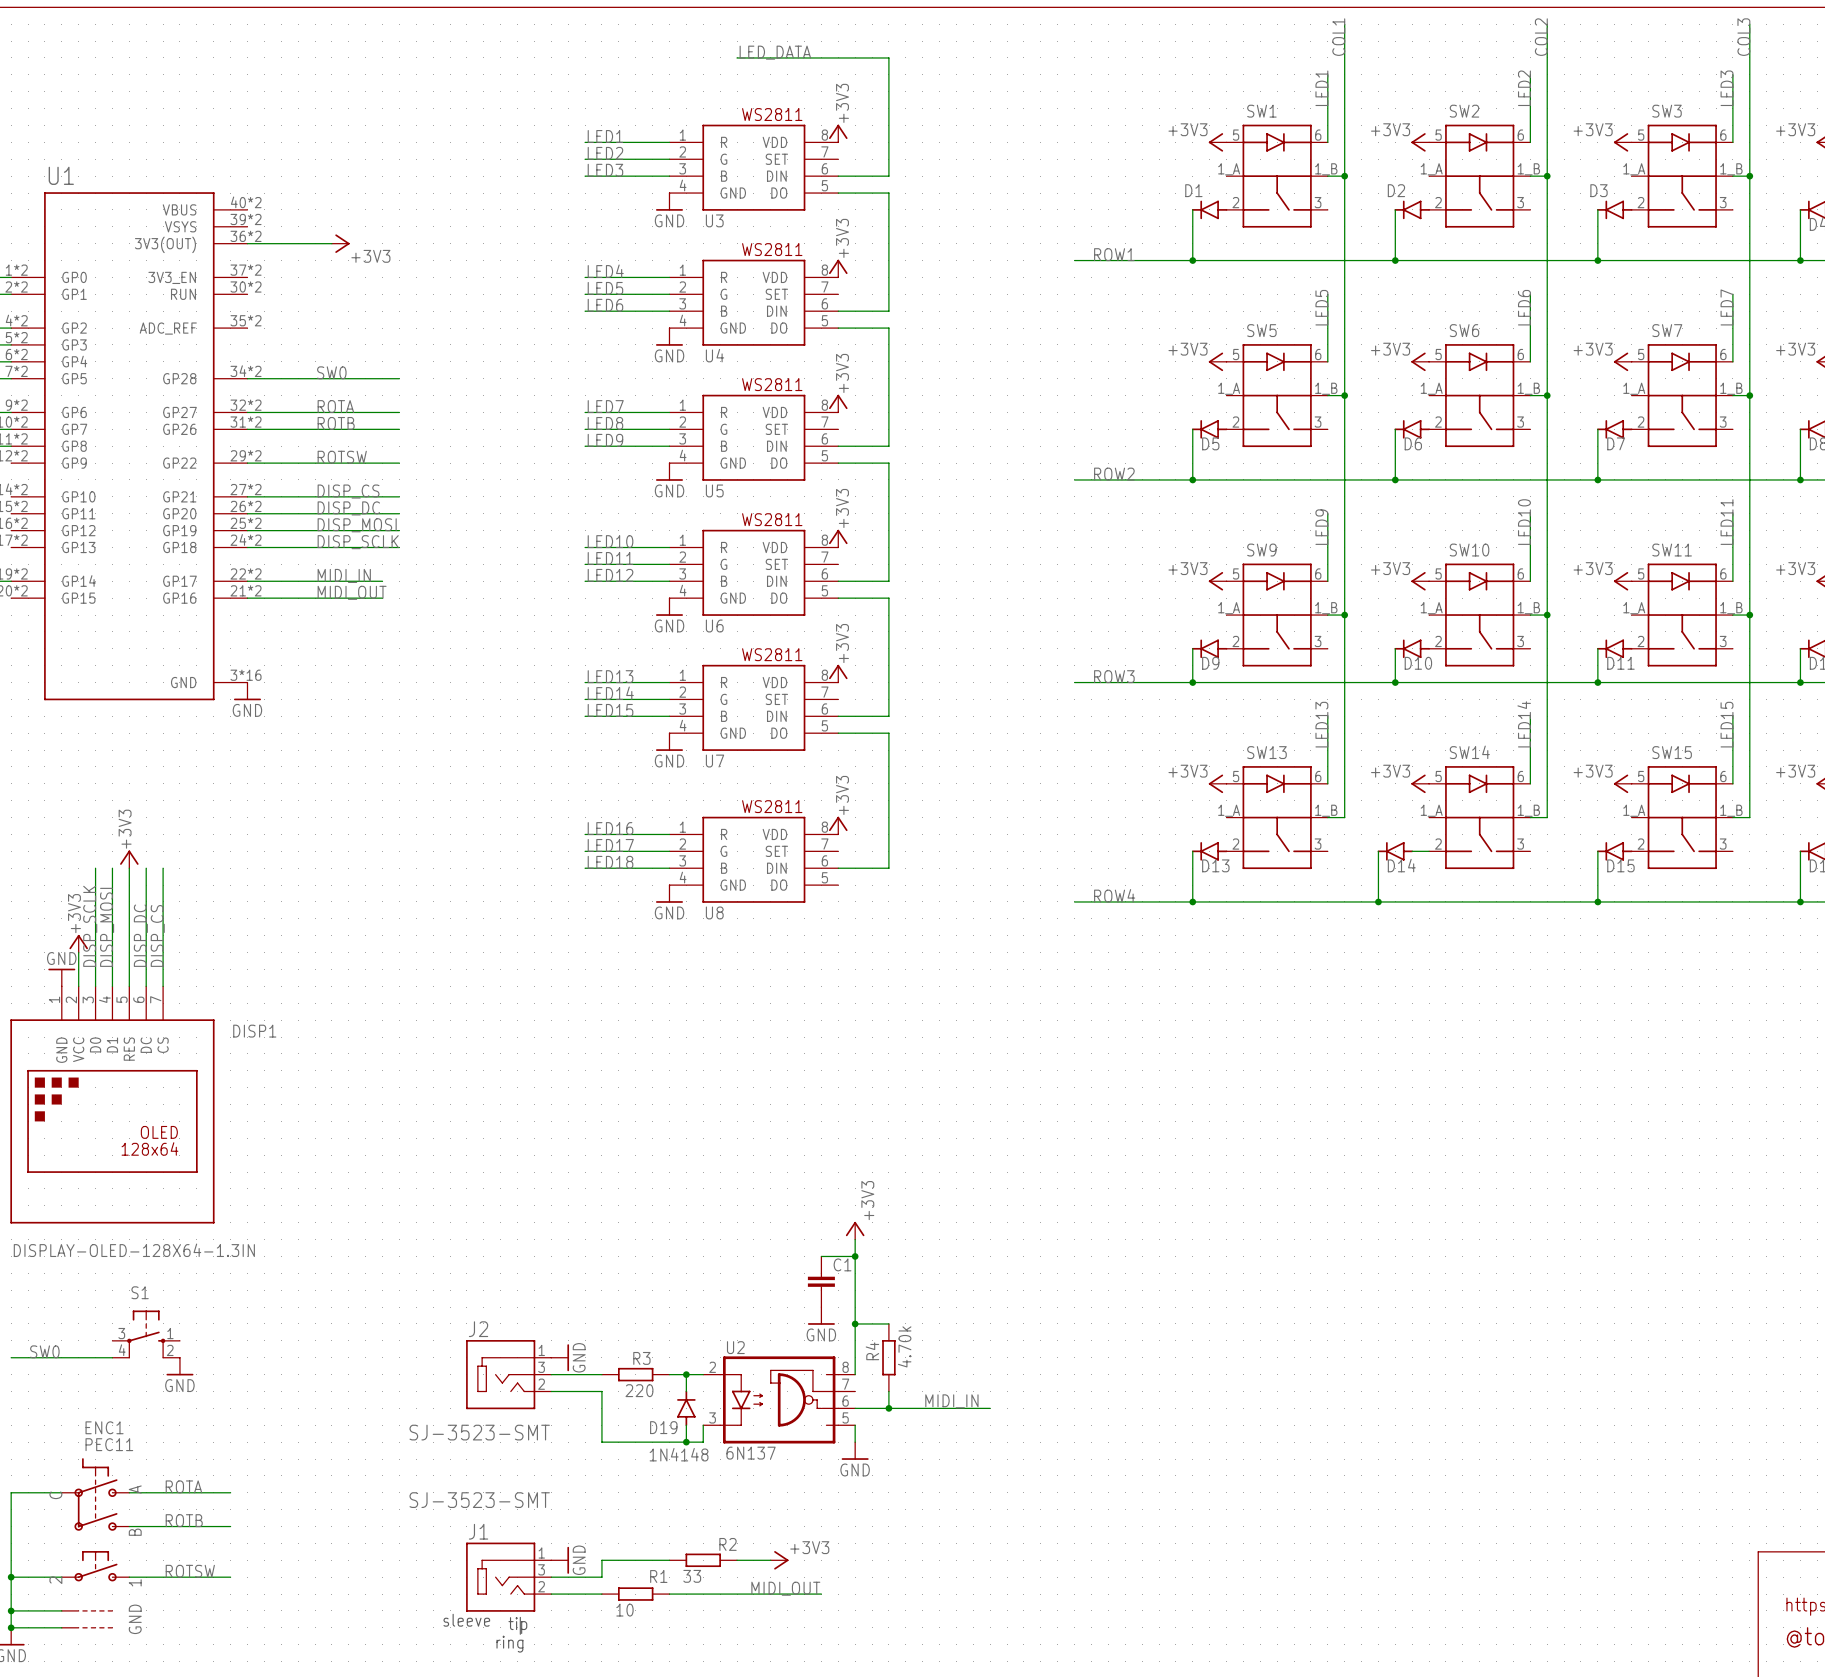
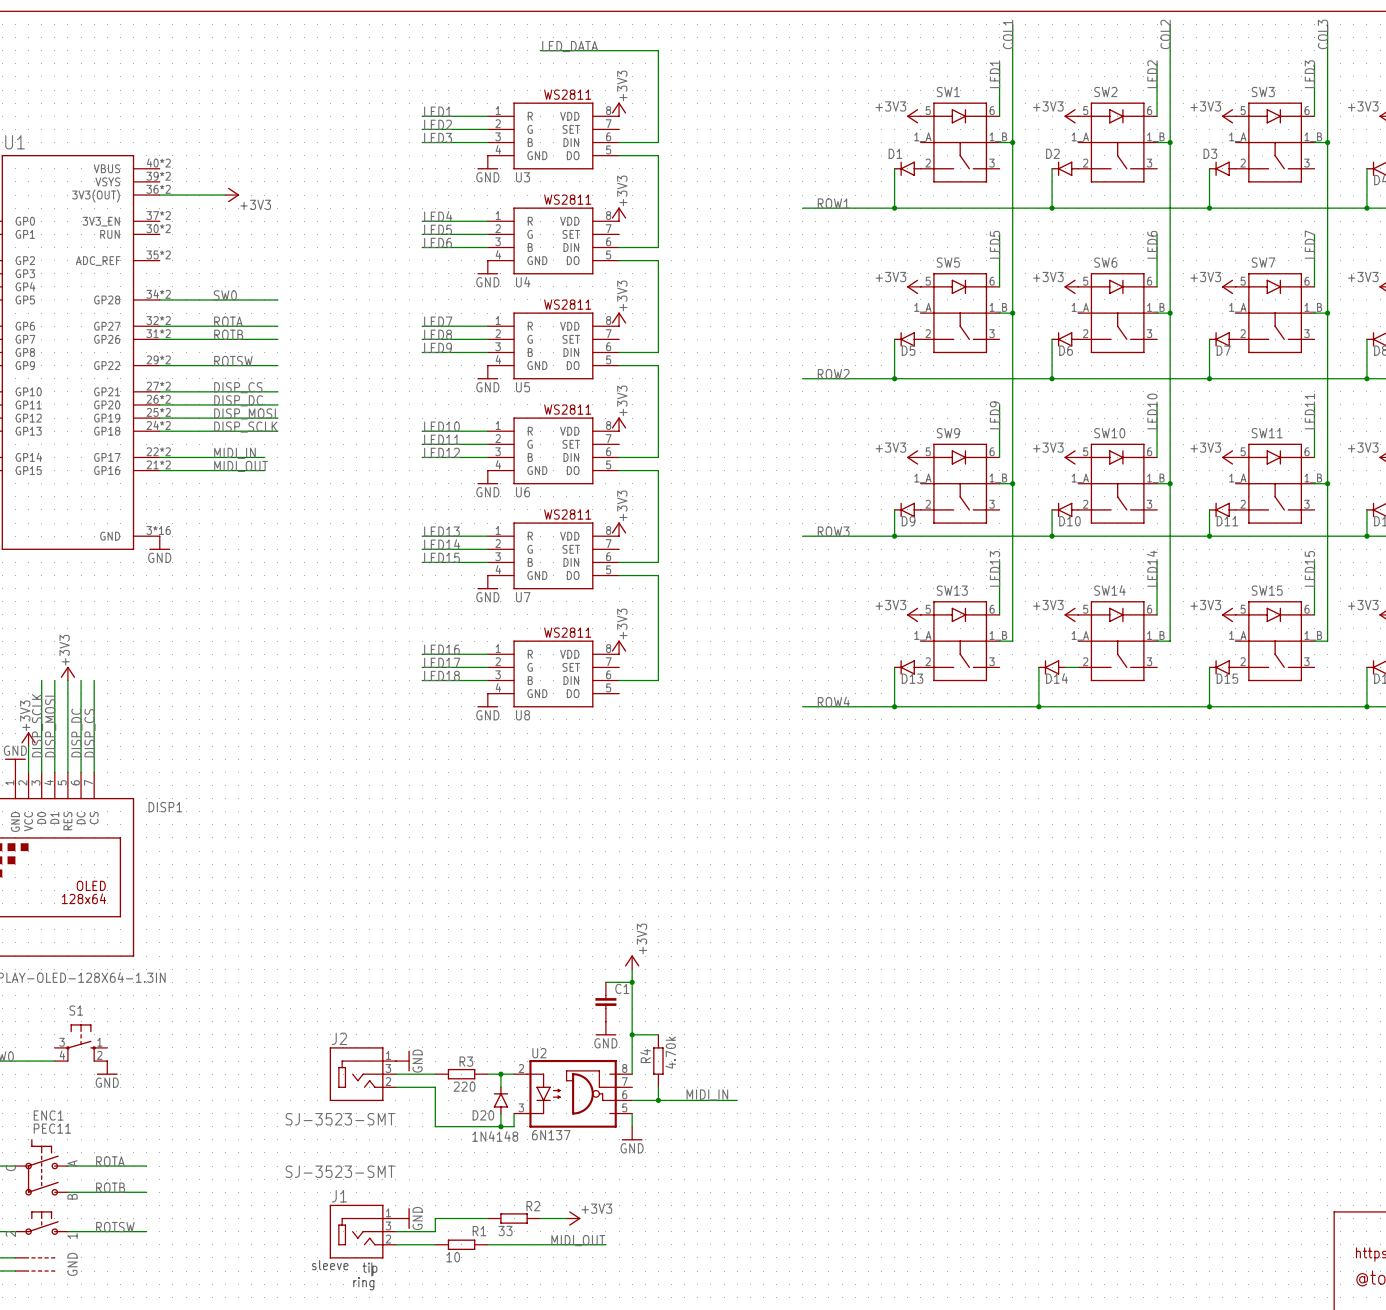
D19 name: D19 (663, 1427) -> D20 (483, 1115)

